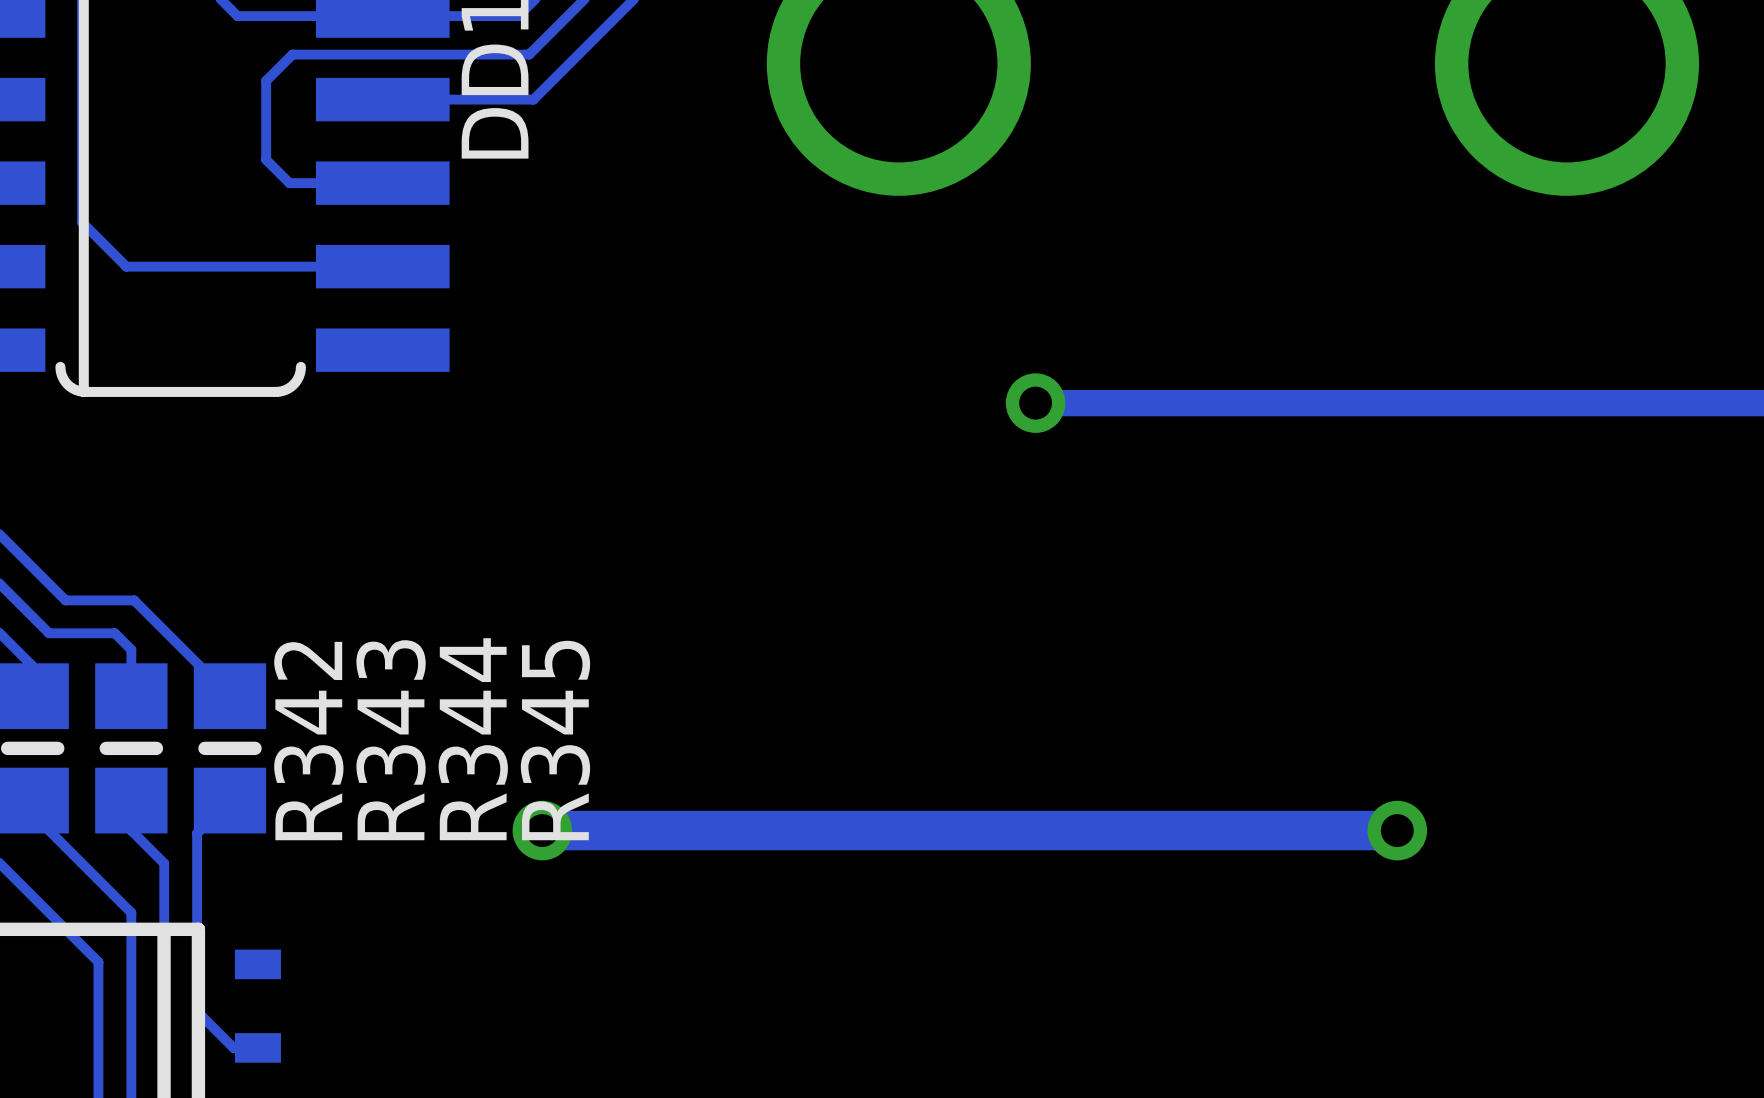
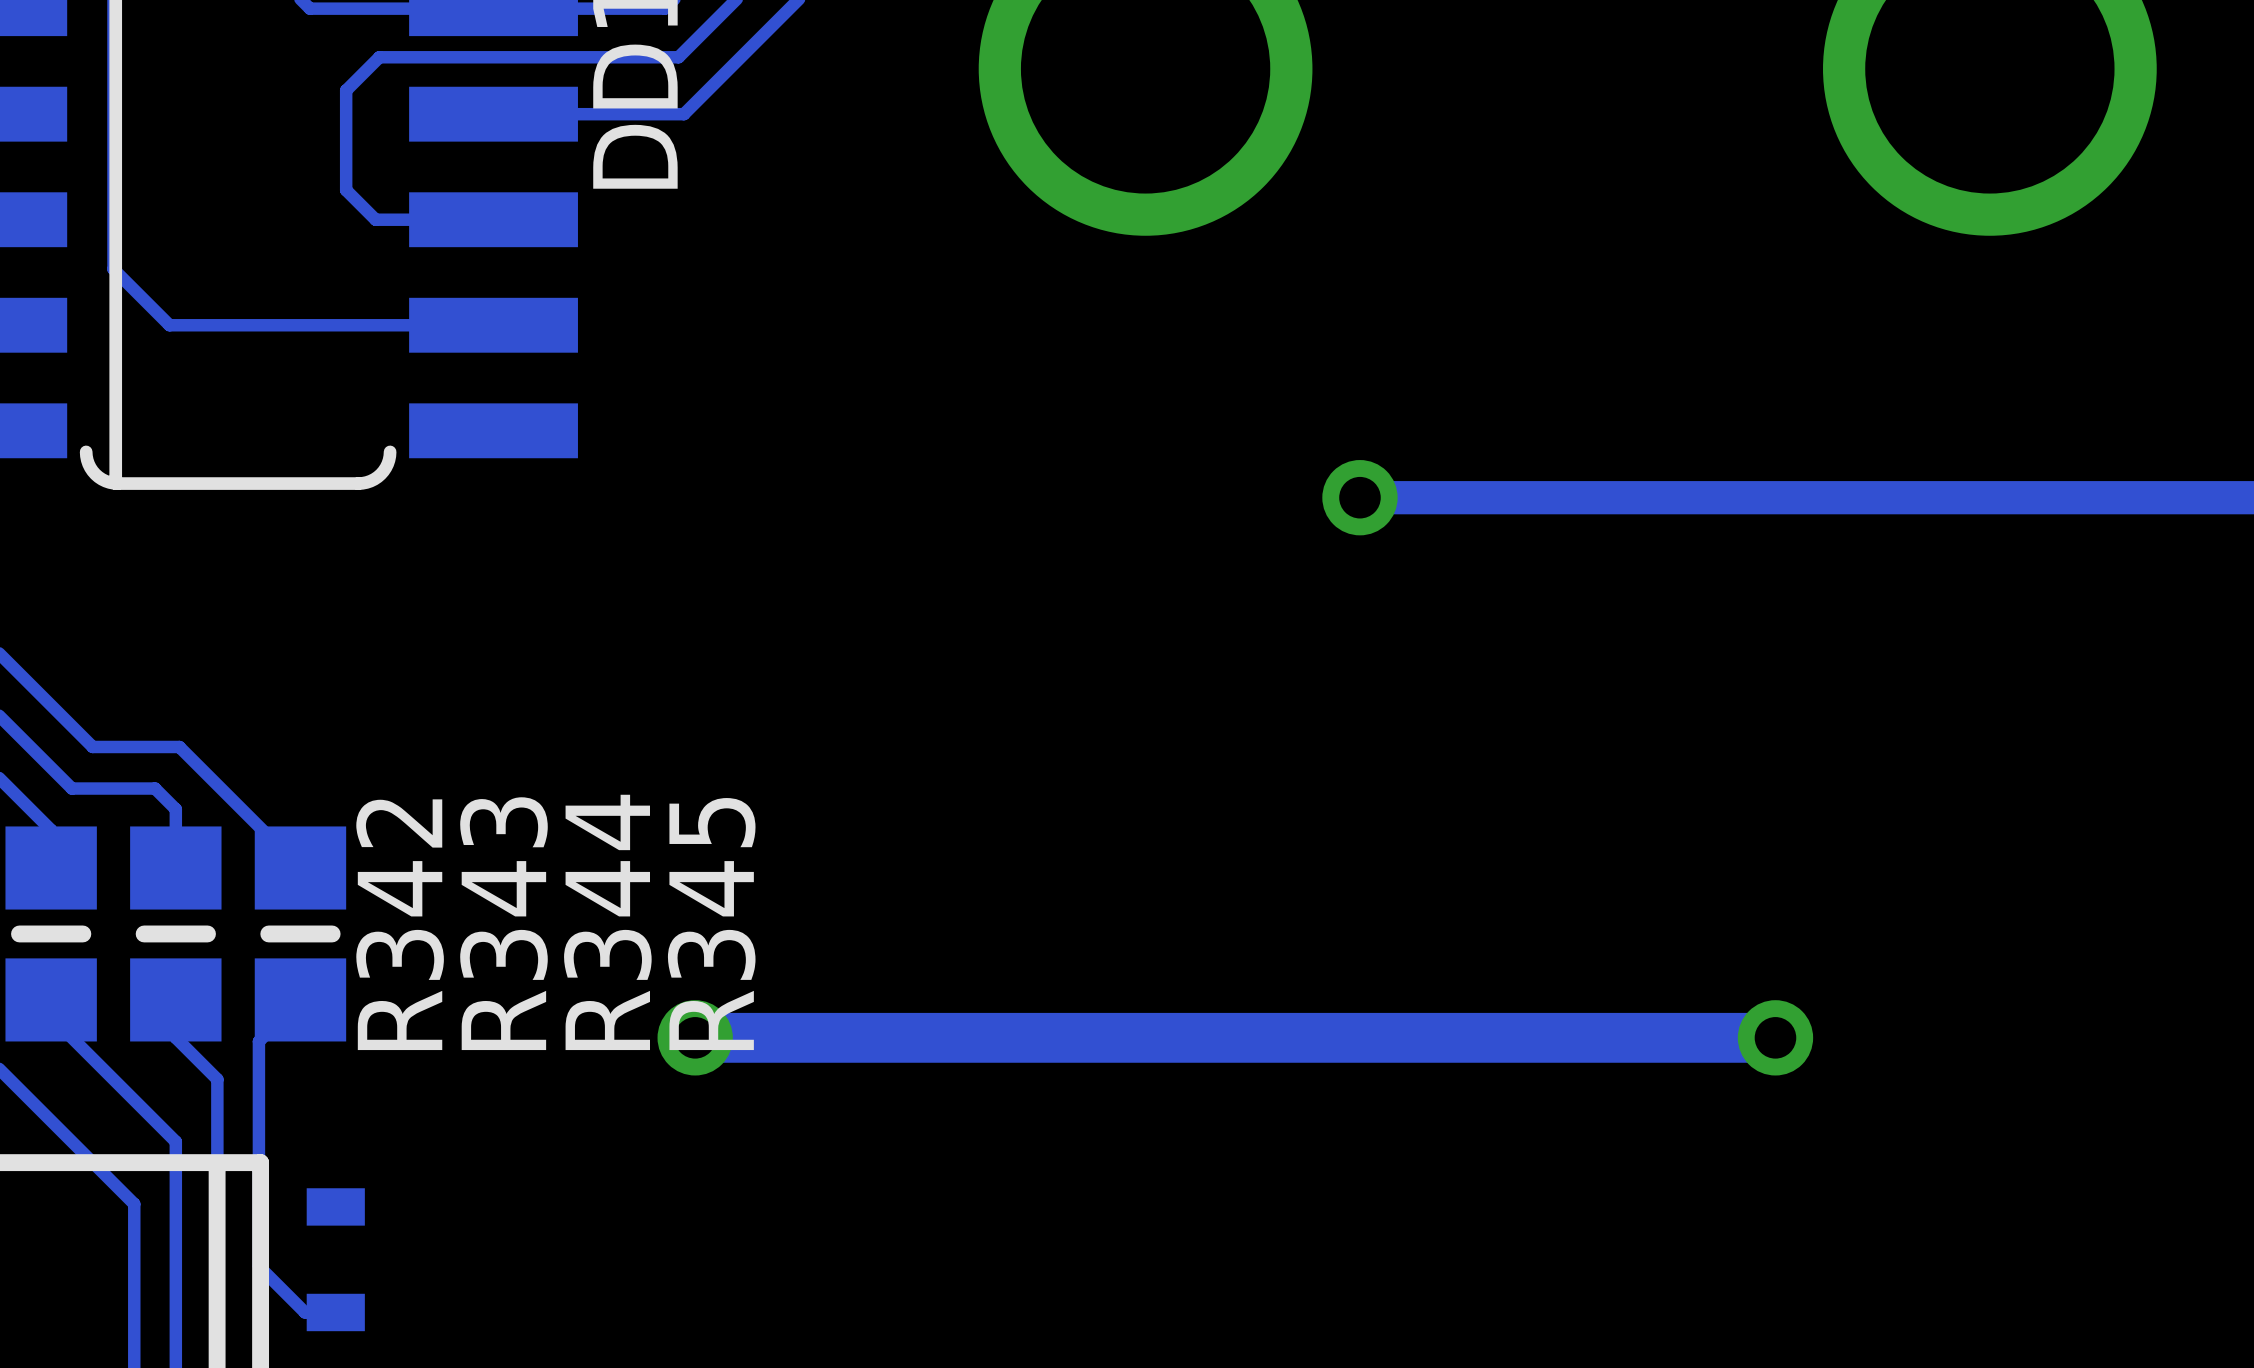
via position: (1035, 403) -> (1359, 497)

